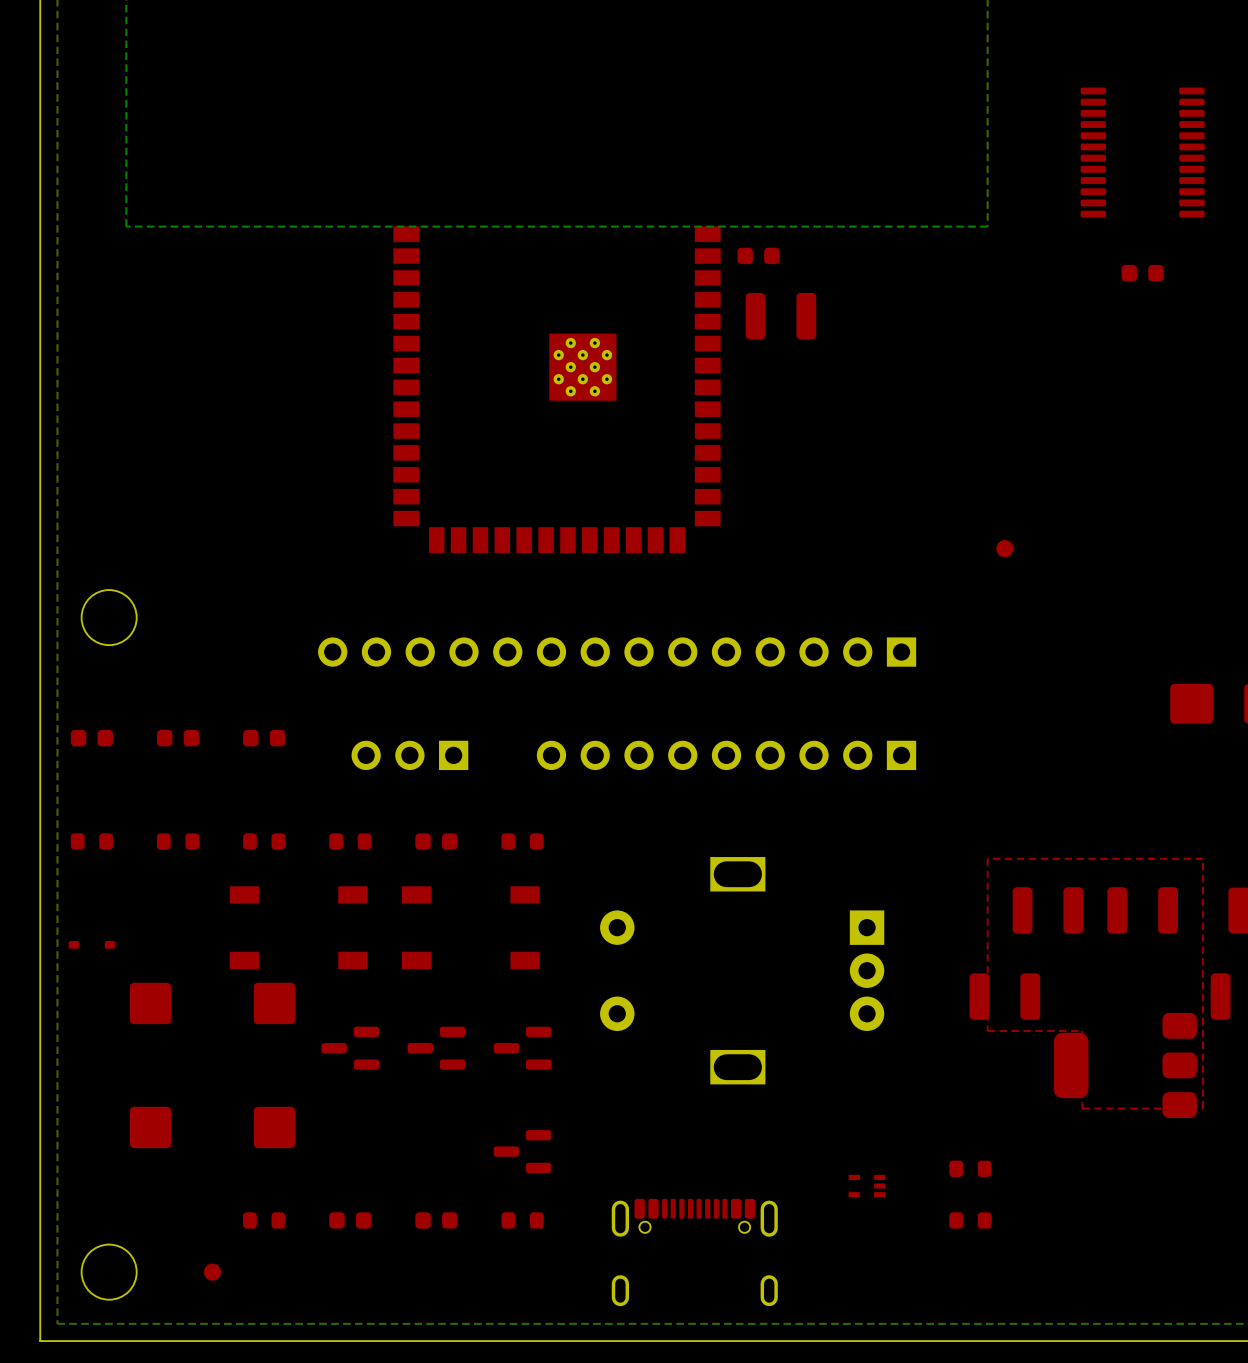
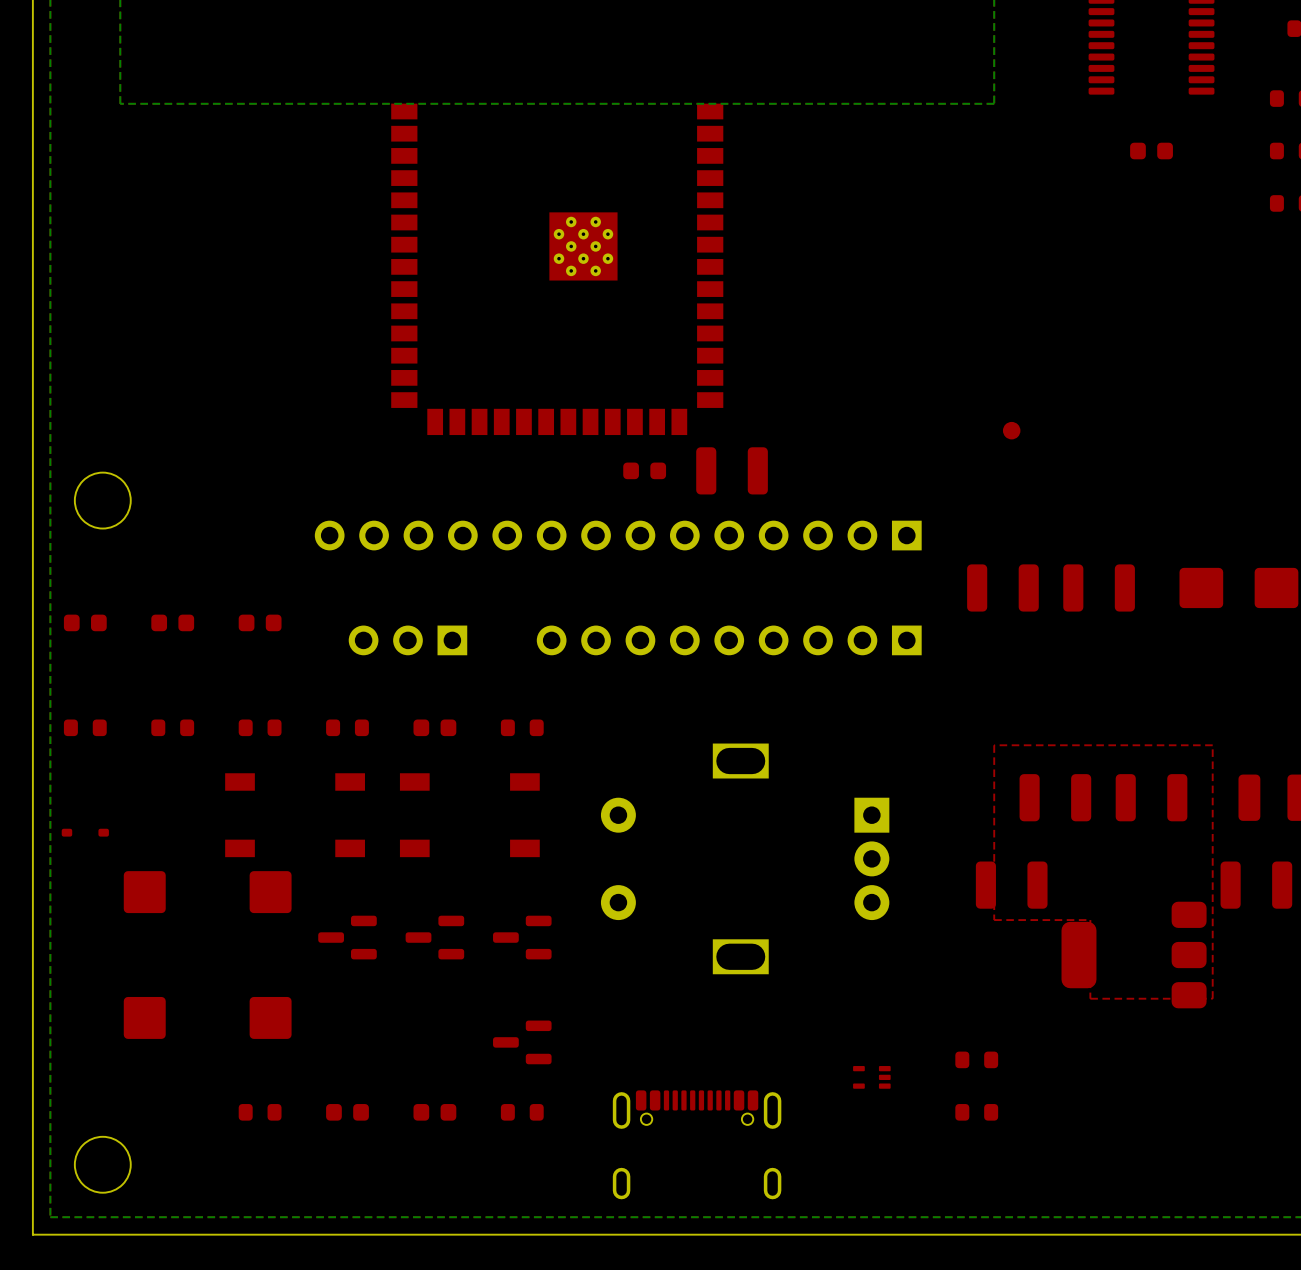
part position: (758, 255) -> (644, 470)
part: (780, 316) -> none
part: none -> (732, 470)
part: none -> (1002, 587)
part: none -> (1099, 587)
part: (212, 1272) -> none

